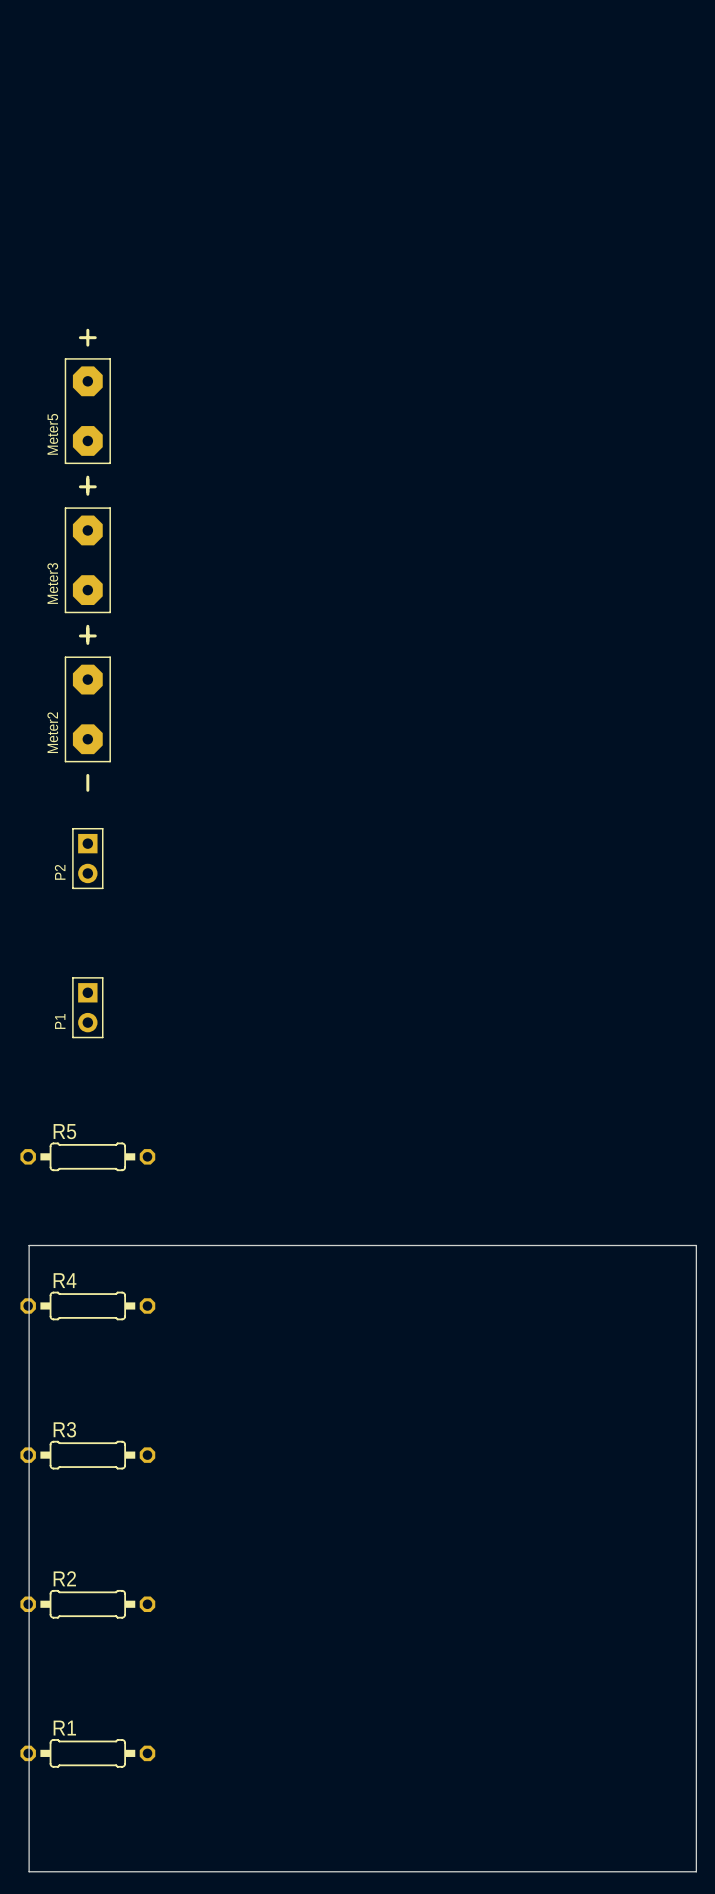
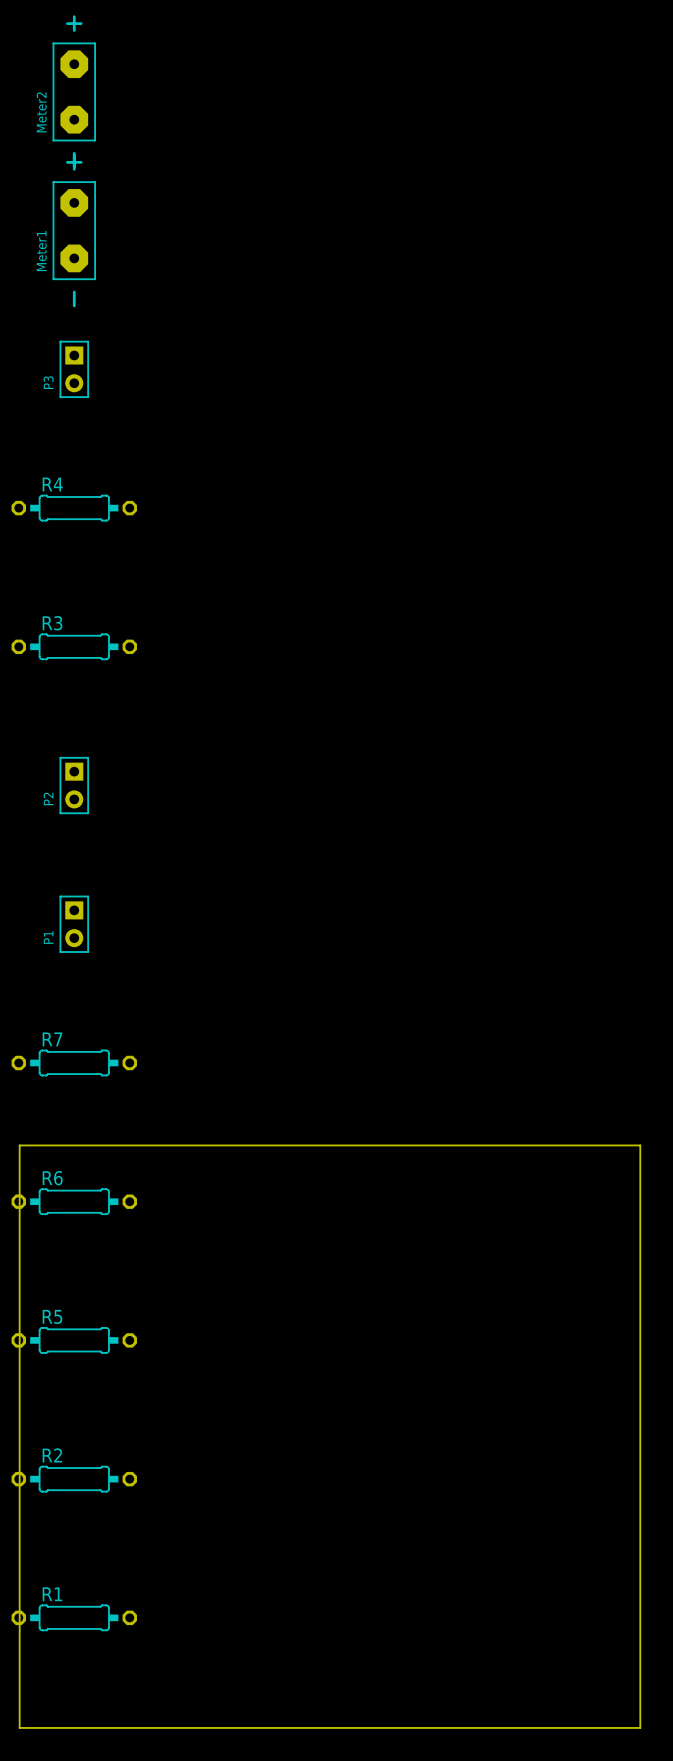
Meter1: none -> (74, 230)
Meter5: (87, 411) -> none
P3: none -> (74, 369)
Meter3: (87, 560) -> none
R4: none -> (74, 508)
Meter2 position: (87, 709) -> (74, 91)
R3: none -> (74, 646)
R5 name: R5 (64, 1131) -> R7 (52, 1039)
R4 name: R4 (65, 1280) -> R6 (52, 1178)
R3 name: R3 (64, 1429) -> R5 (52, 1316)

